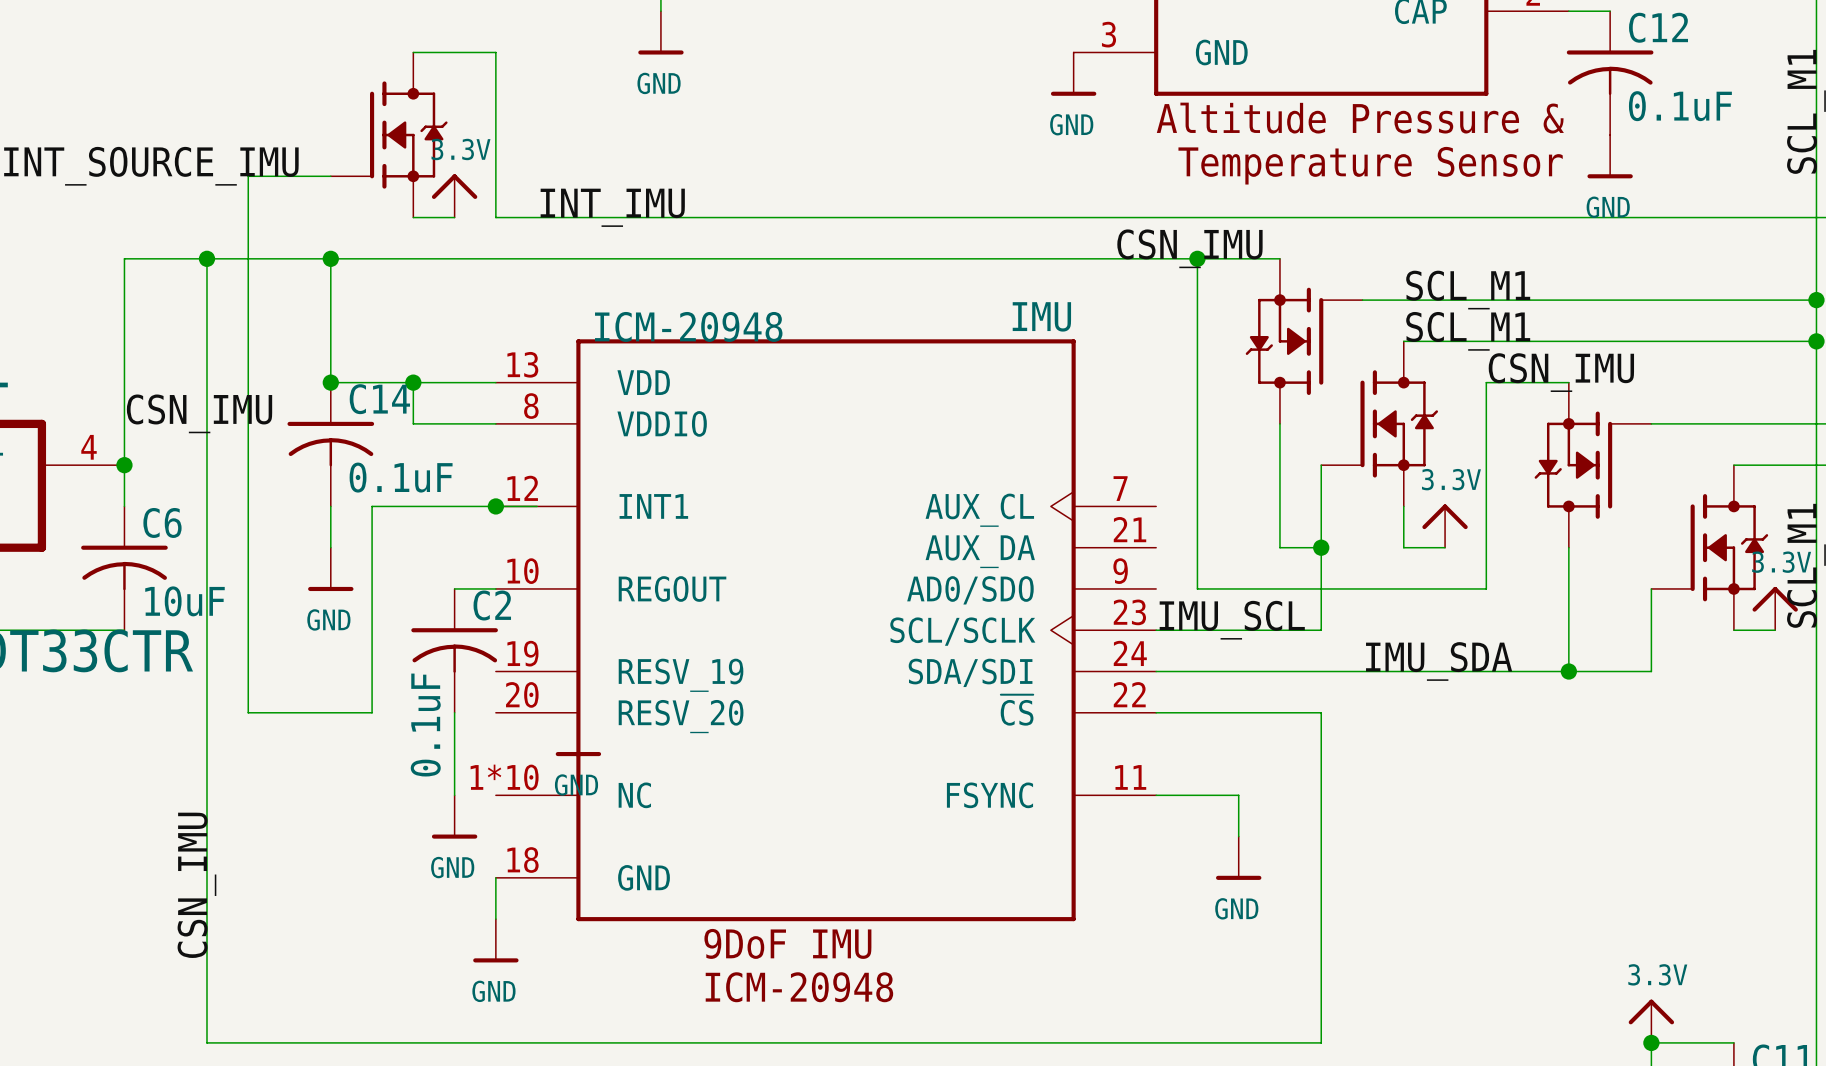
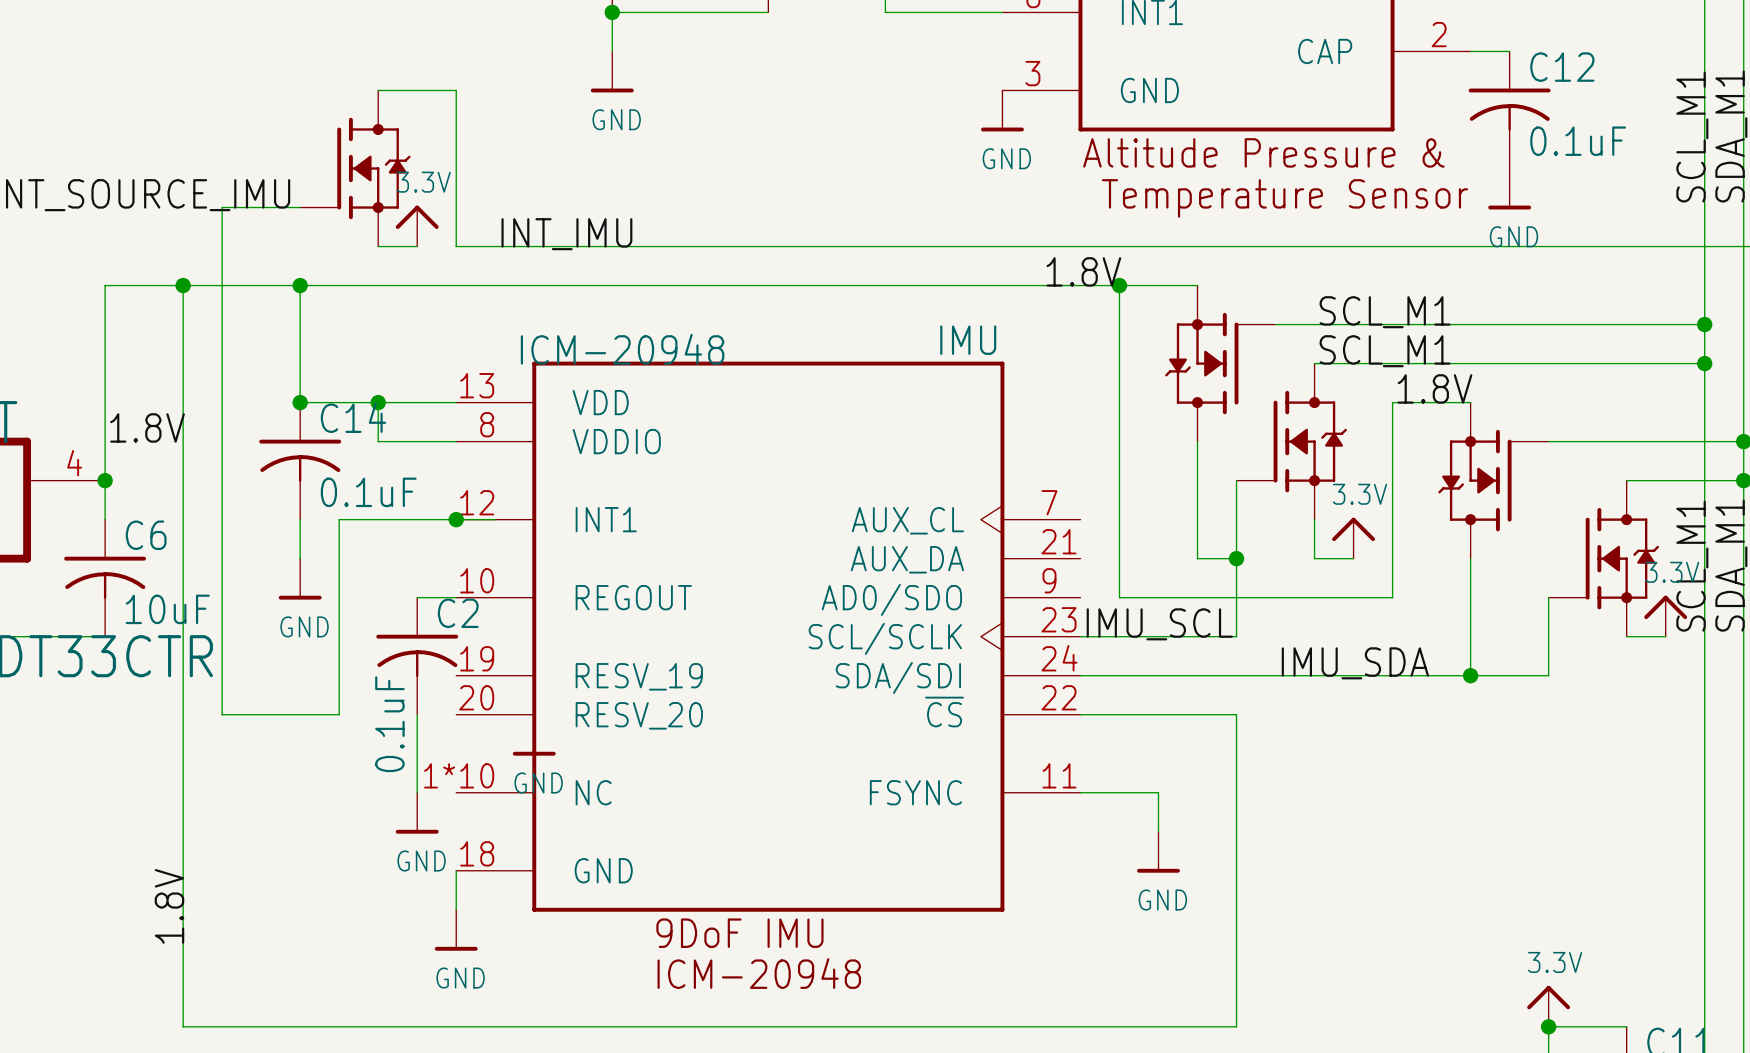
label: CSN_IMU (1189, 248) -> 1.8V (1083, 271)
label: CSN_IMU (1561, 372) -> 1.8V (1434, 388)
label: CSN_IMU (199, 413) -> 1.8V (147, 427)
label: CSN_IMU (196, 885) -> 1.8V (169, 906)

